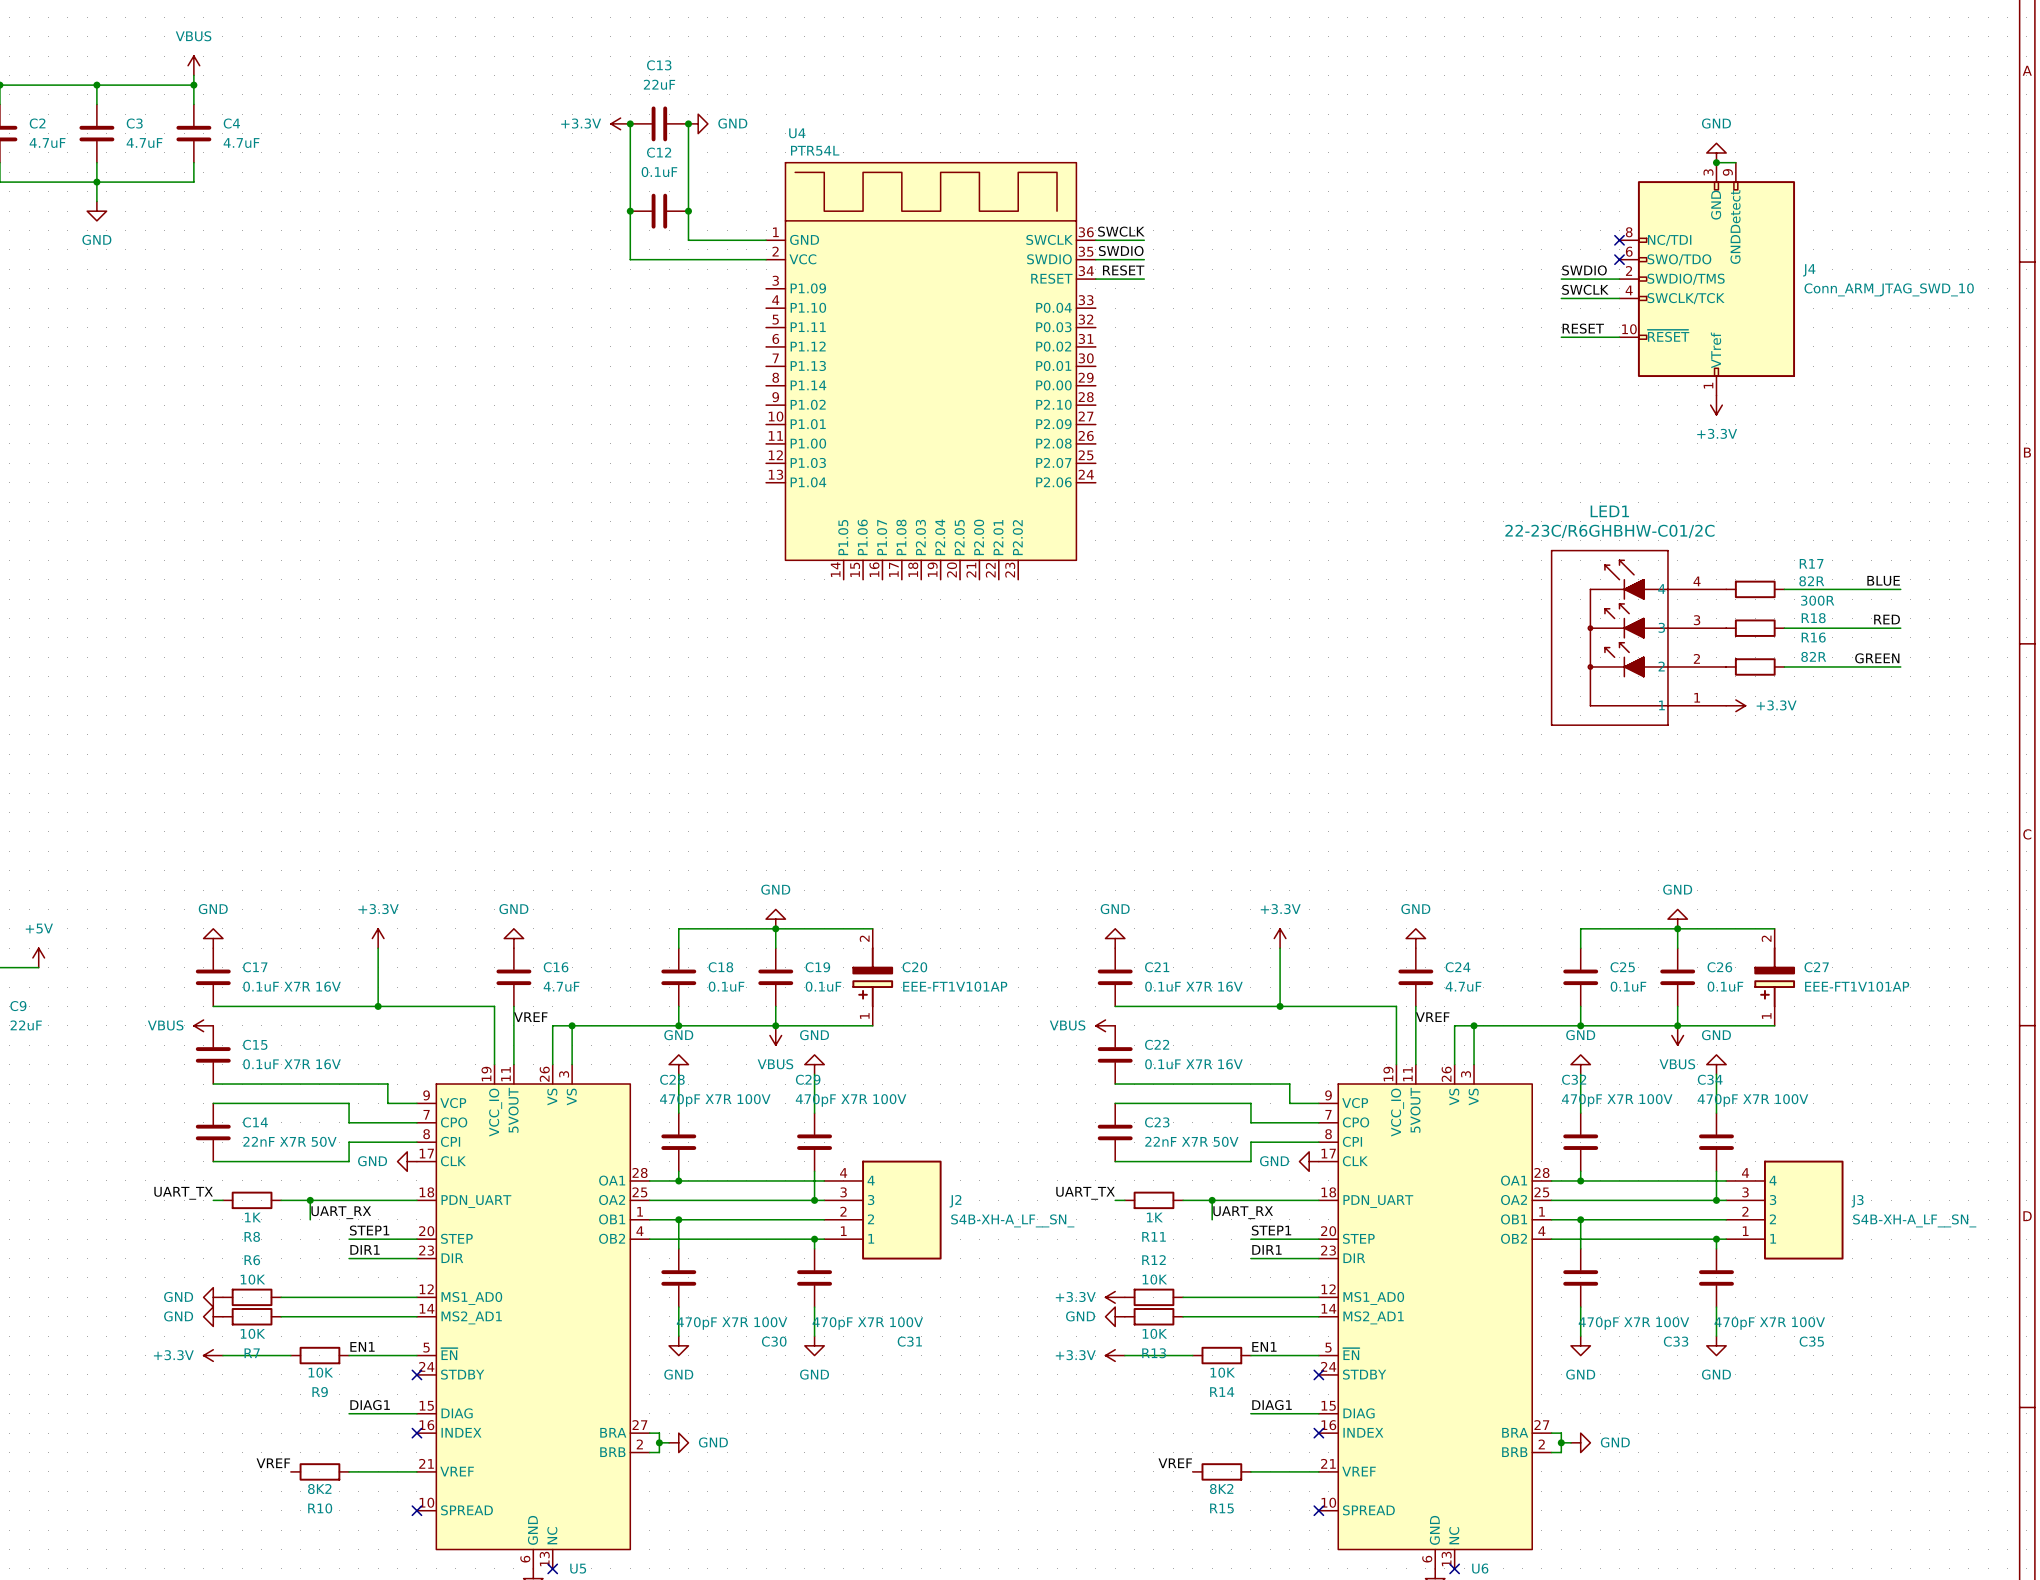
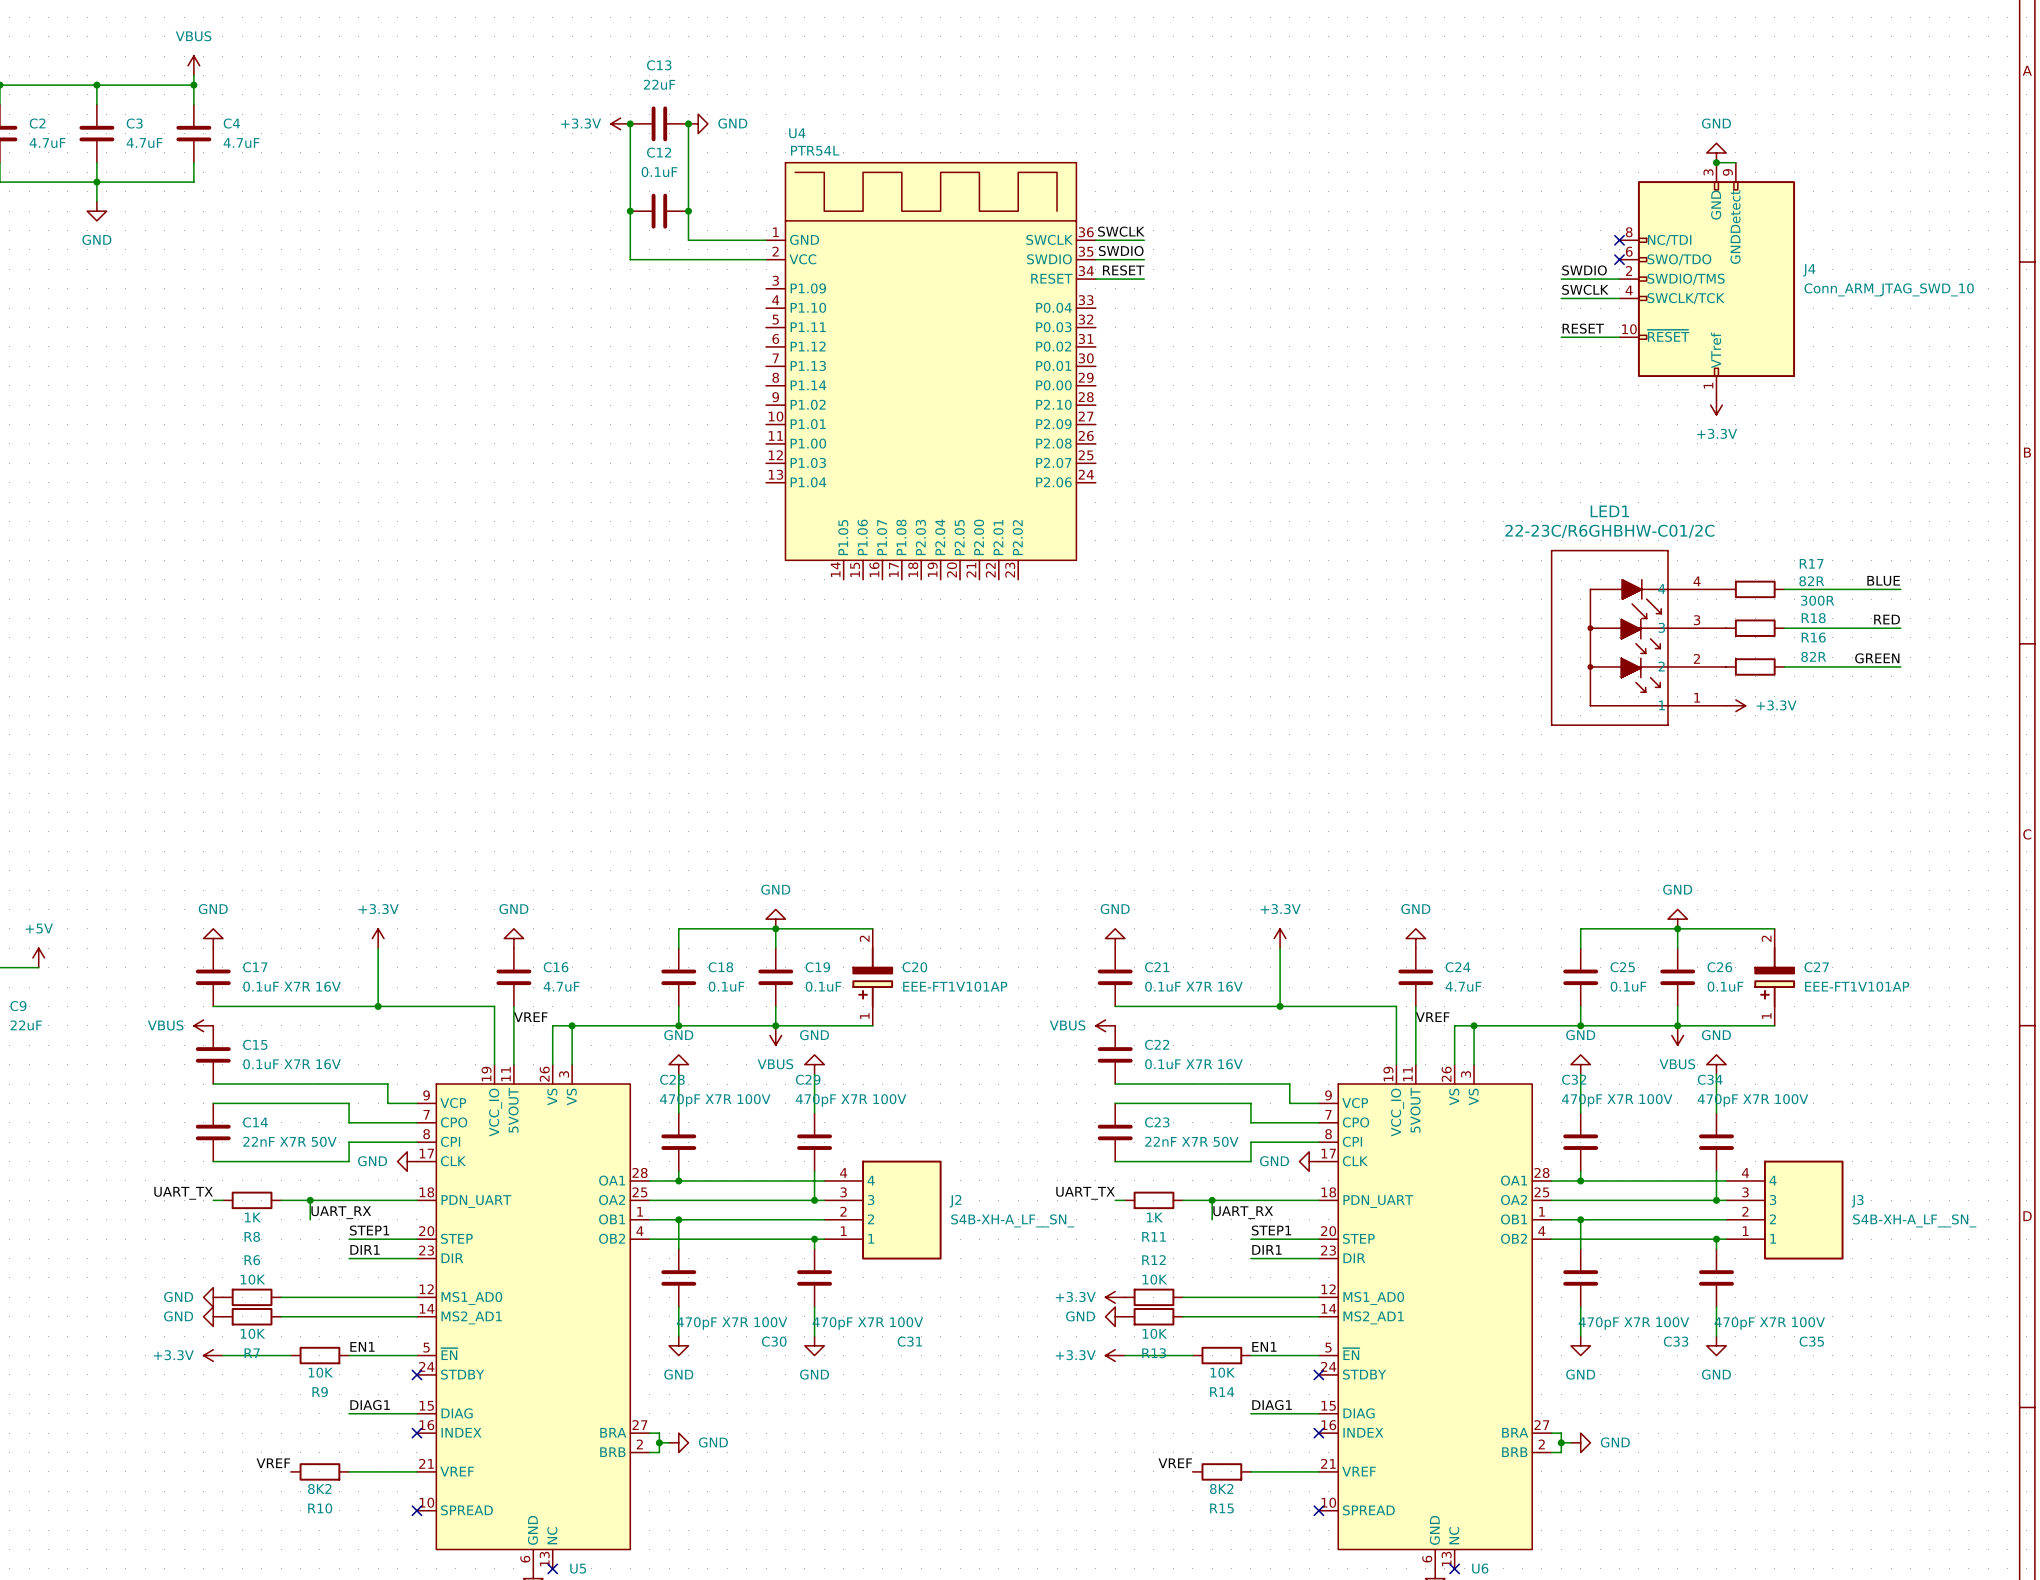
LED1 symbol: [1551, 550, 1727, 726] -> [1551, 550, 1727, 726]

